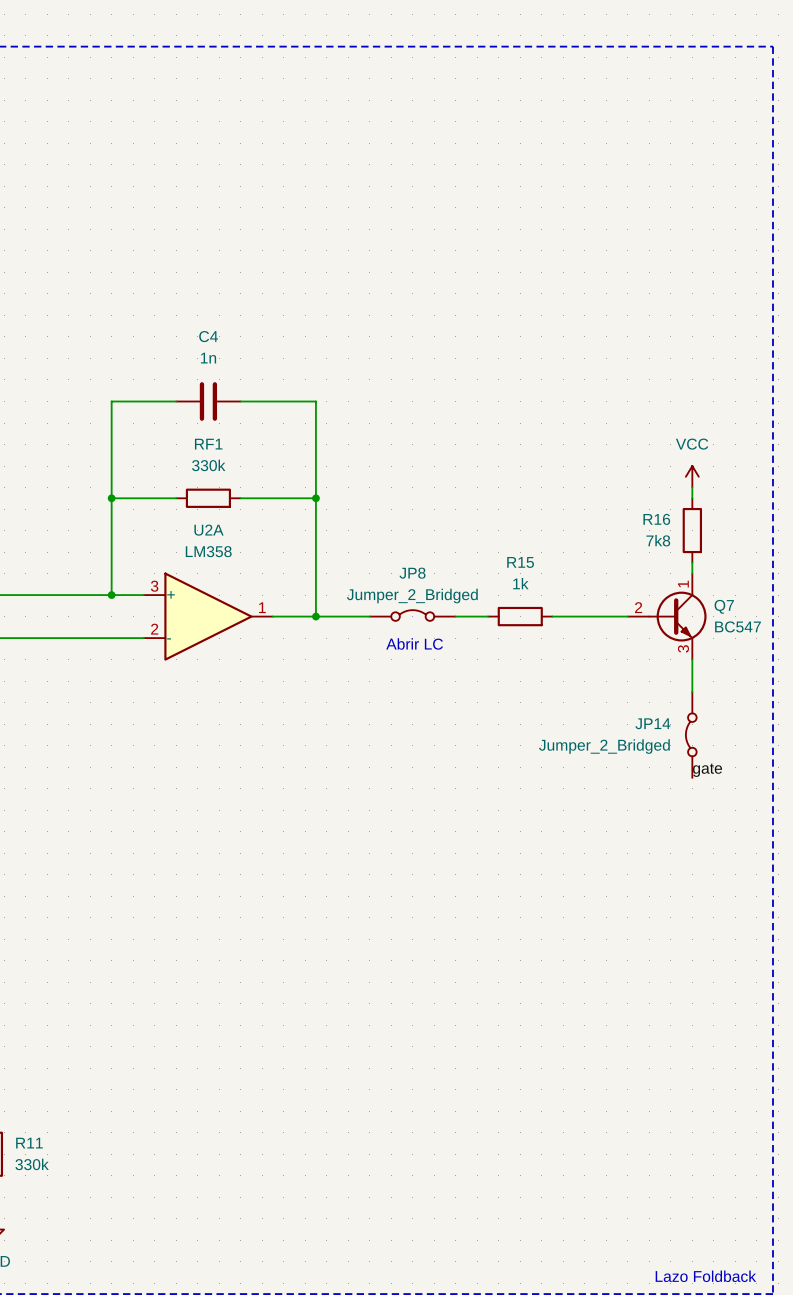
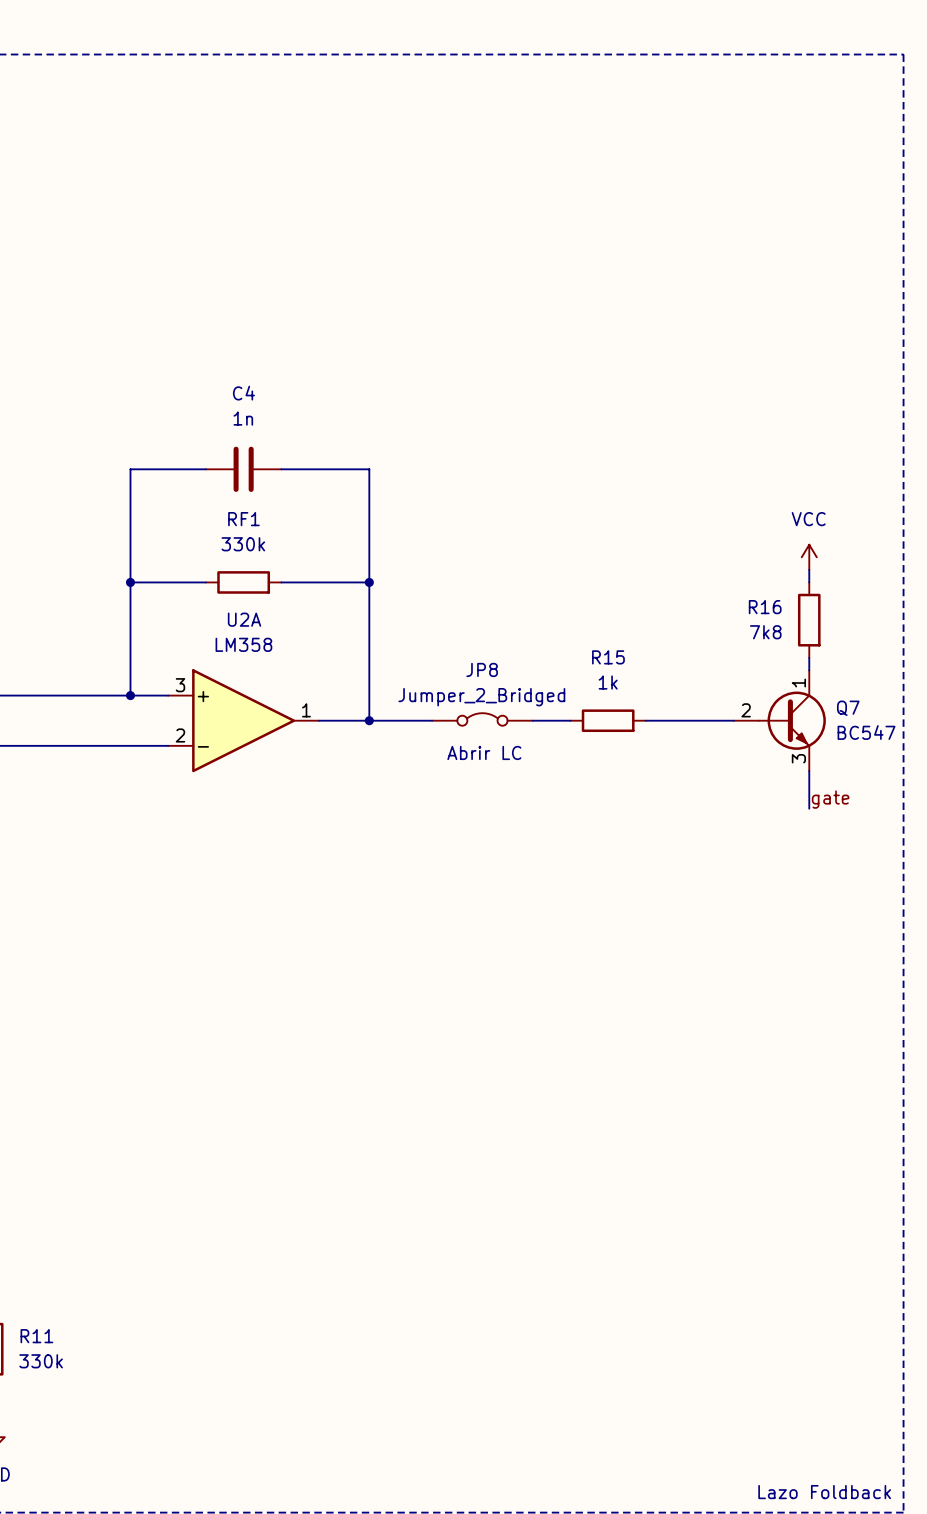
JP14: Jumper_2_Bridged (691, 734) -> none
label position: gate (707, 770) -> gate (830, 799)

